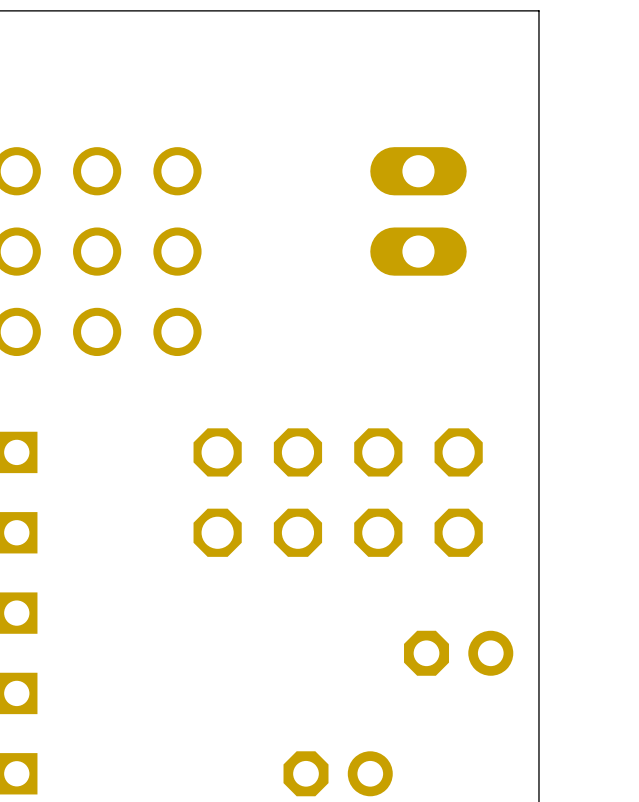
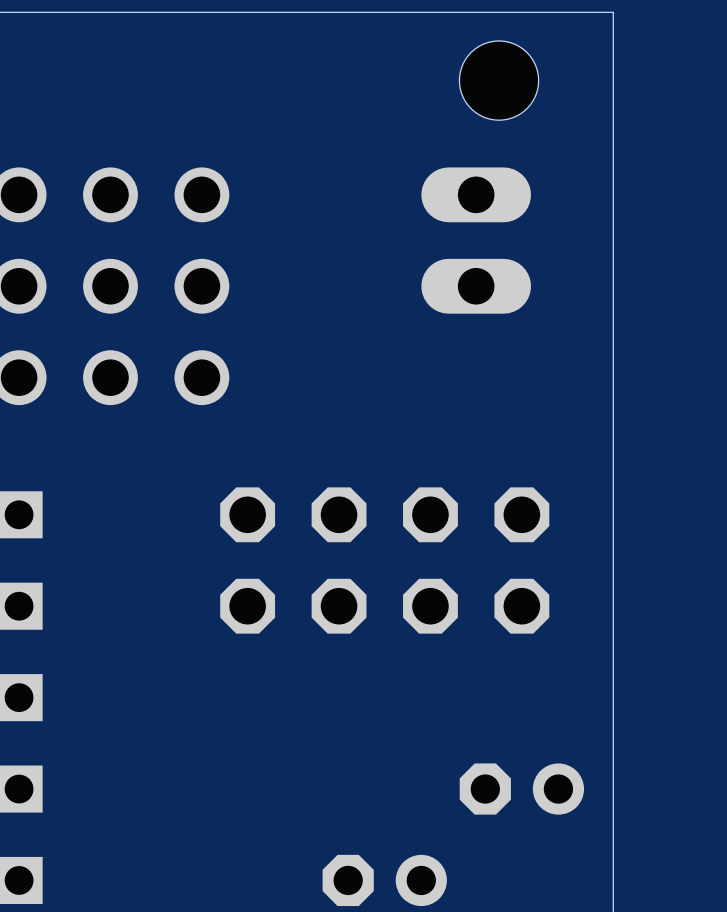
hole: none -> (499, 80)
part position: (458, 653) -> (521, 789)

